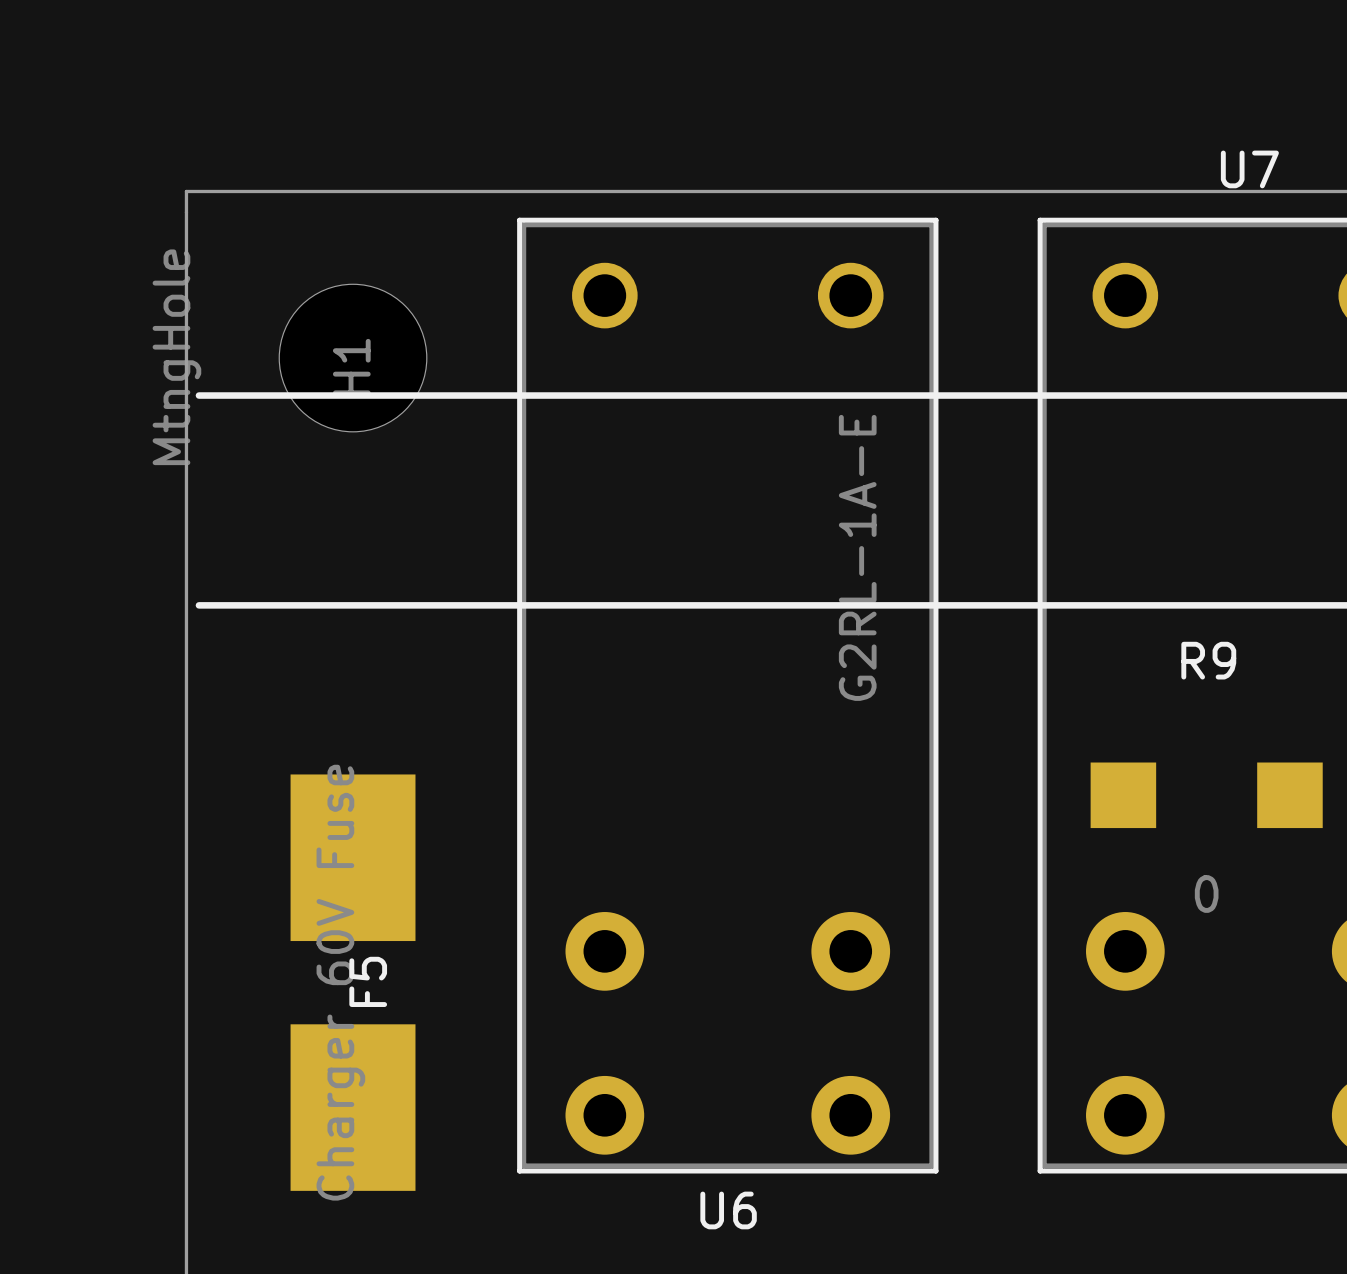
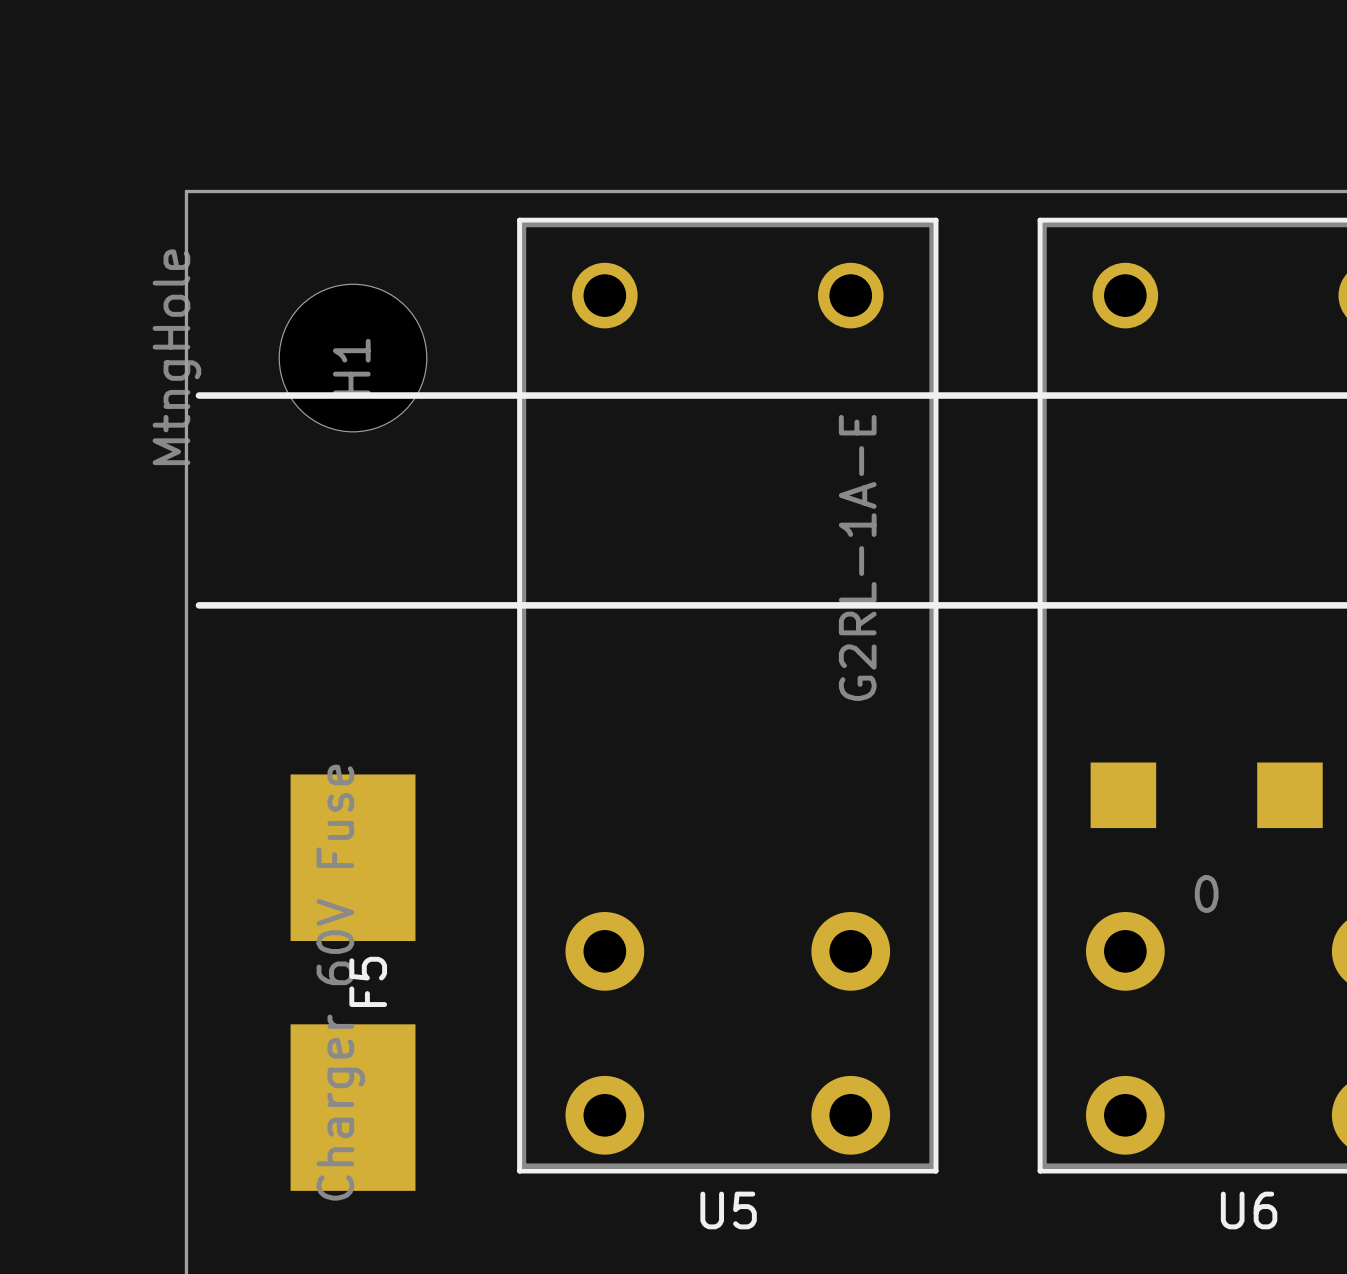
U7 name: U7 (1249, 169) -> U6 (1249, 1210)
R9 name: R9 (1208, 660) -> none
U6 name: U6 (728, 1210) -> U5 (728, 1210)

